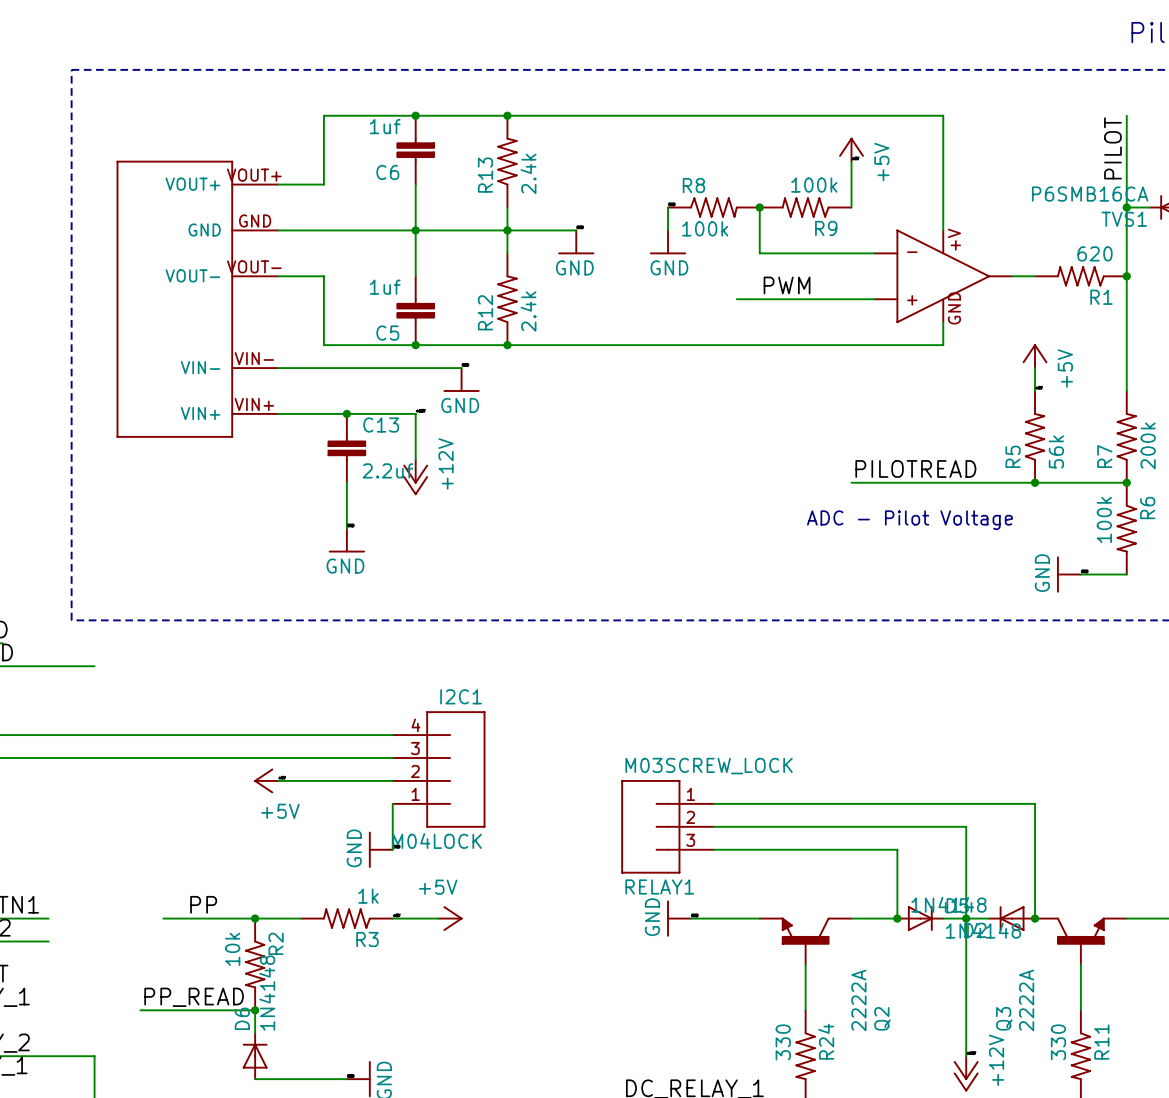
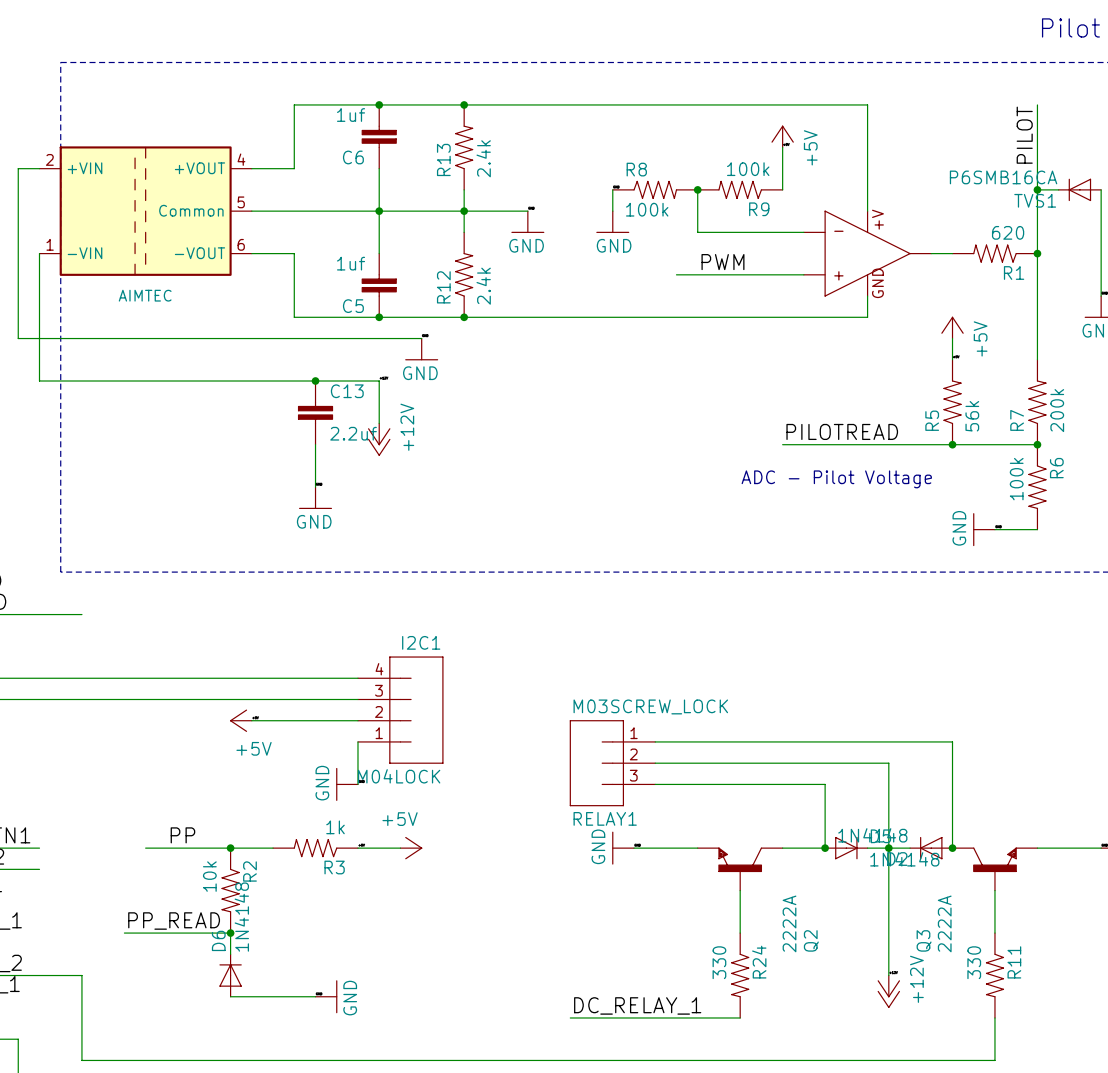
wire: none -> (39, 168) (18, 168) (18, 338) (251, 338)
part: none -> AIMTEC (145, 211)
wire: none -> (39, 253) (39, 381) (251, 381)
part: (197, 299) -> none

